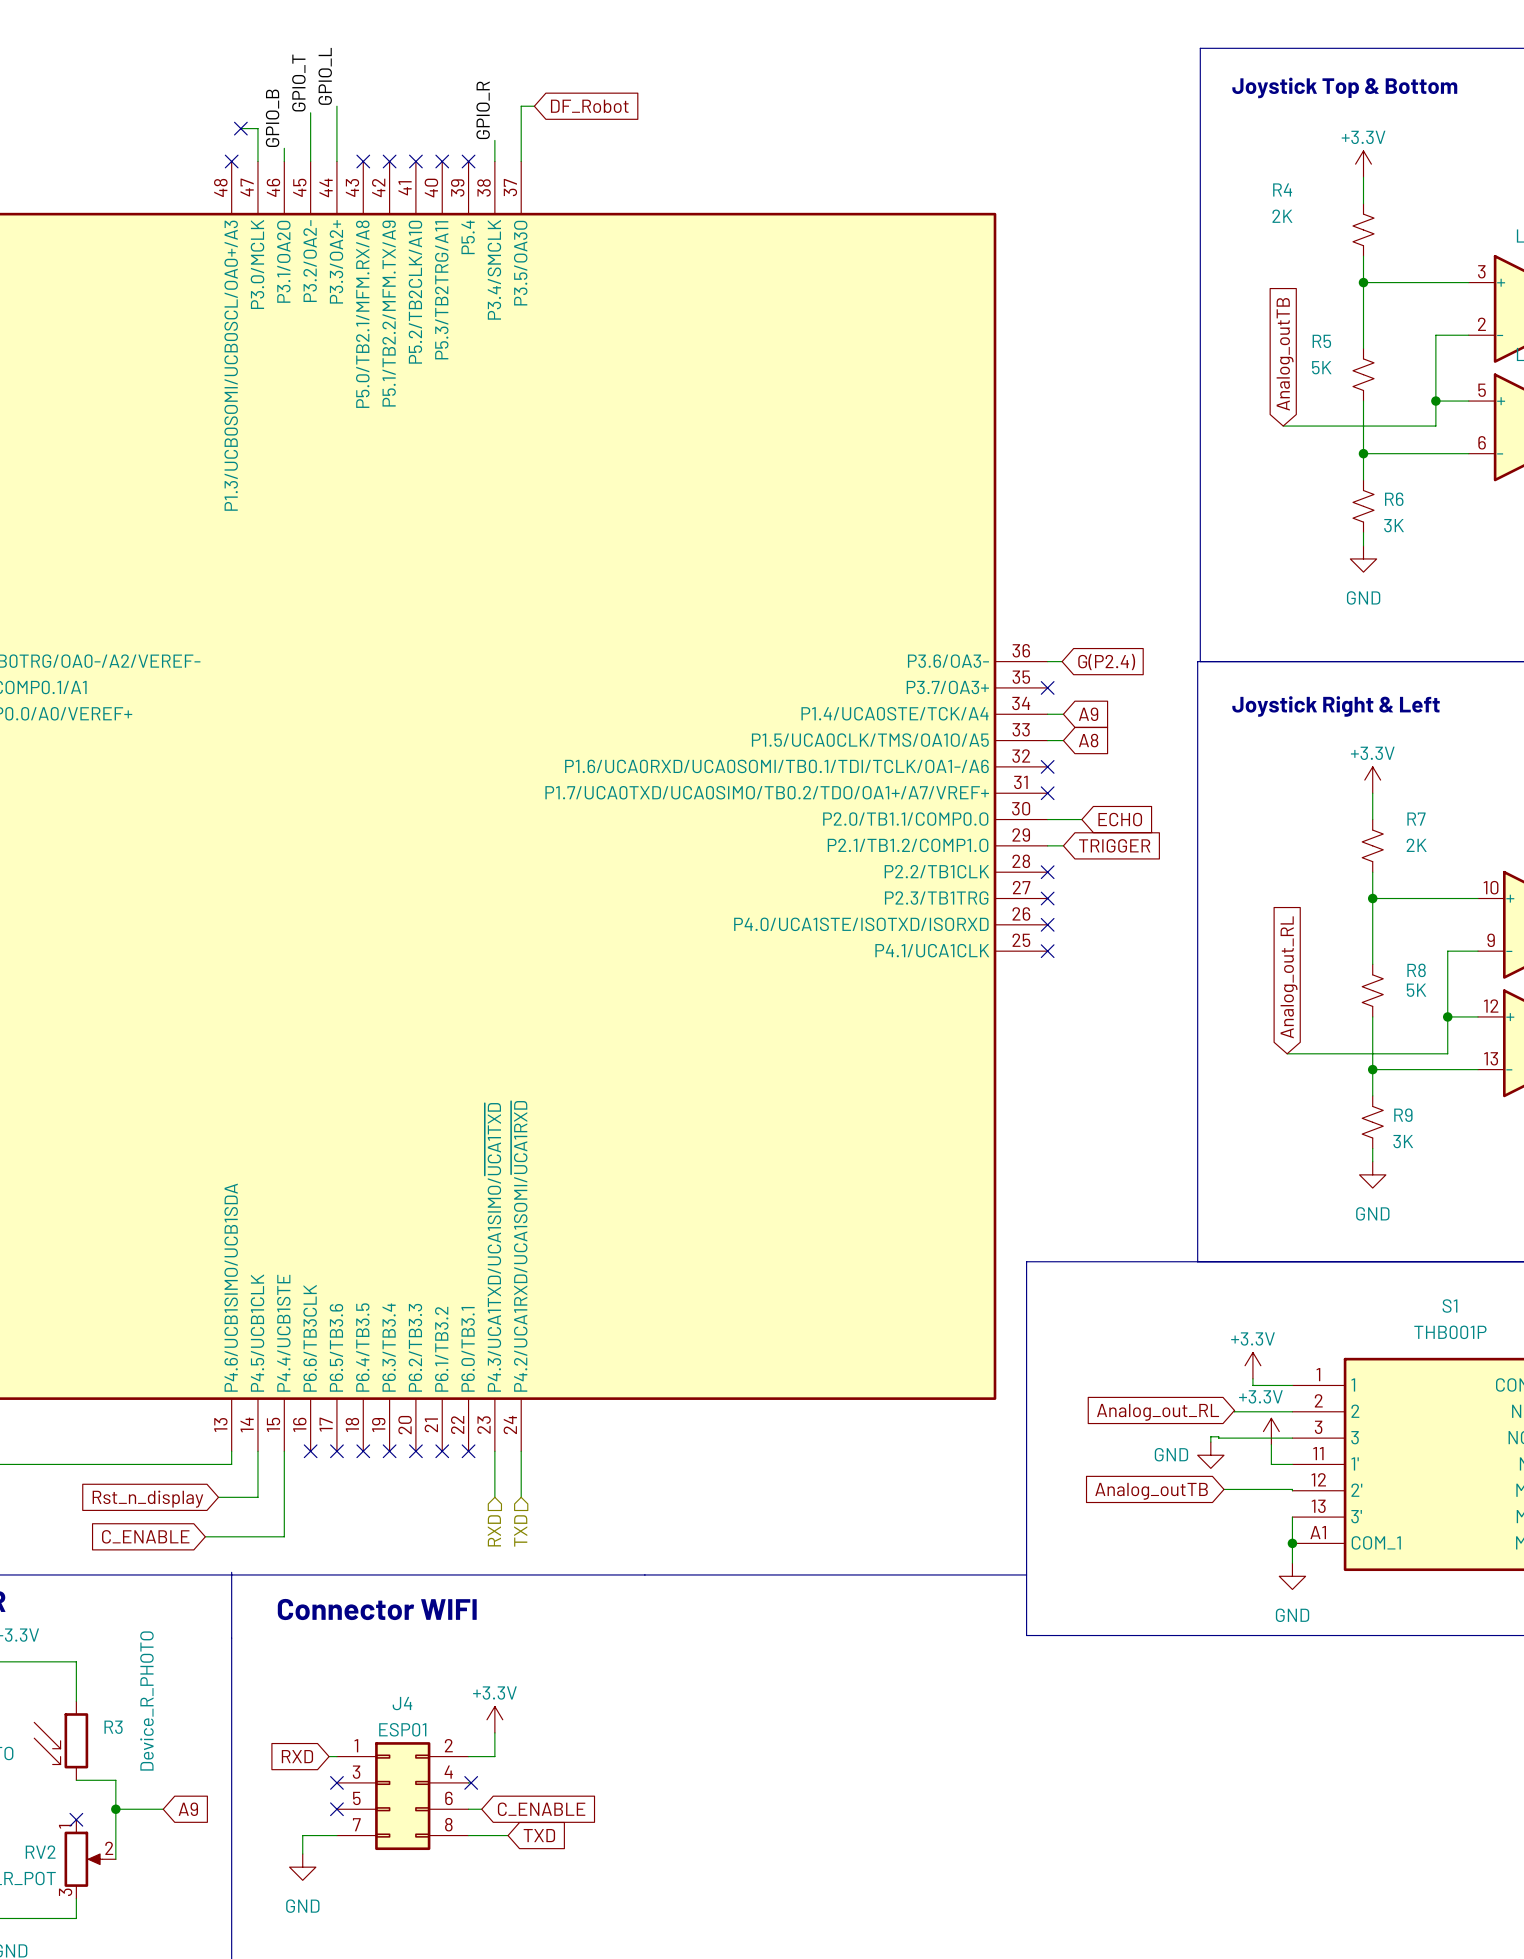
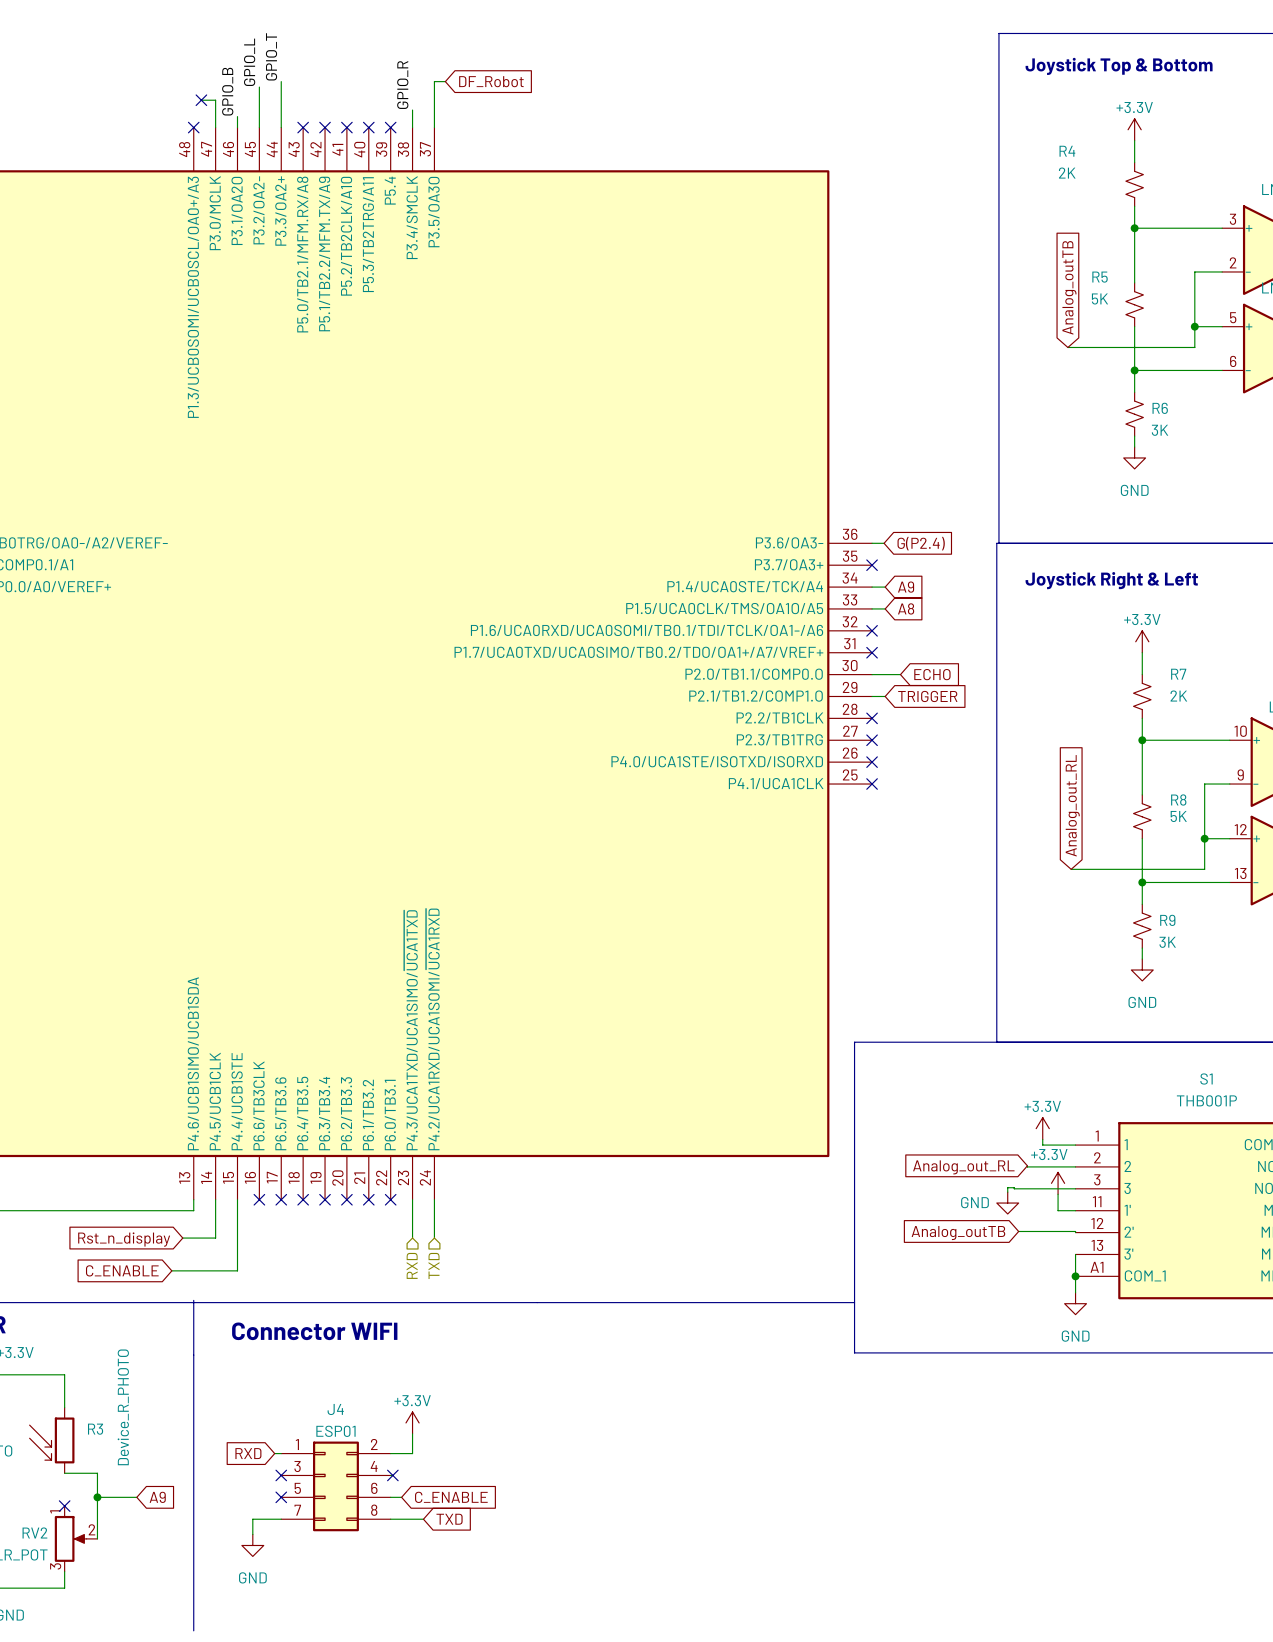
label: GPIO_L (325, 76) -> GPIO_T (271, 56)
label: GPIO_T (298, 83) -> GPIO_L (249, 62)

